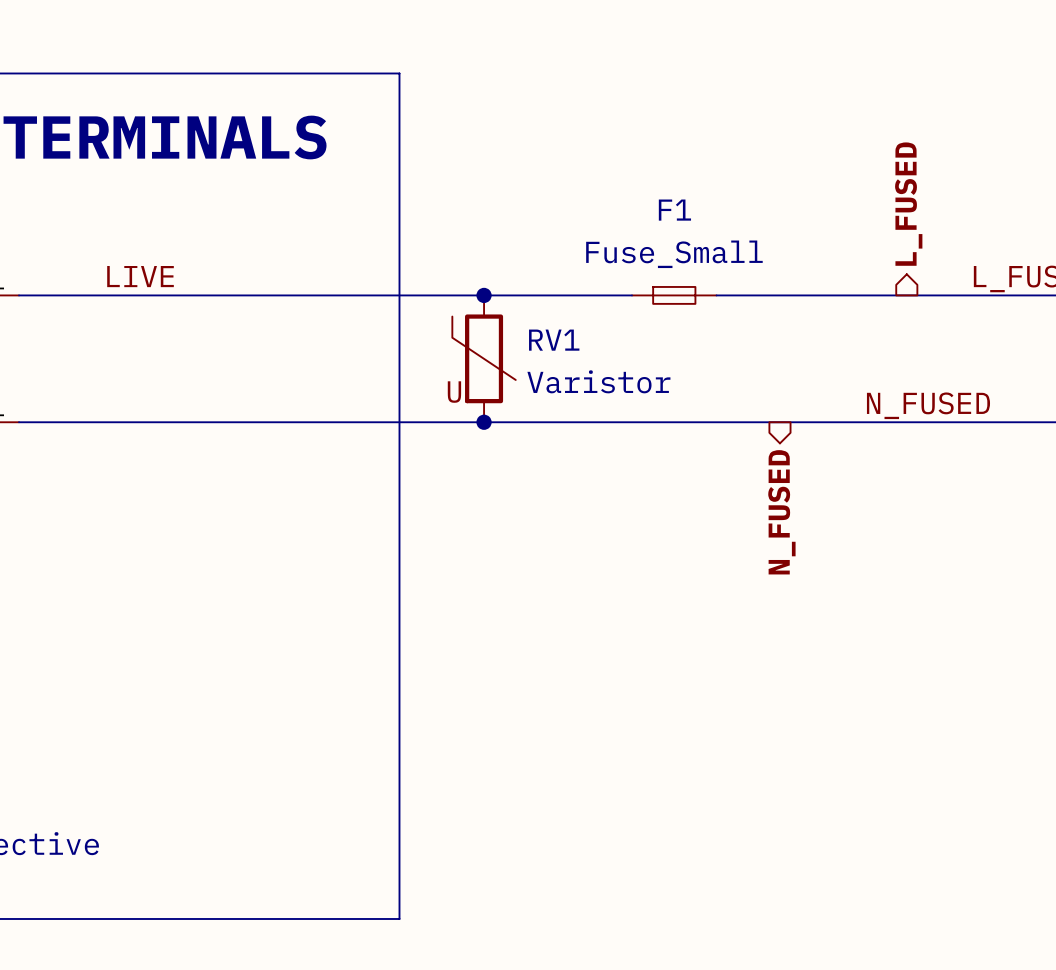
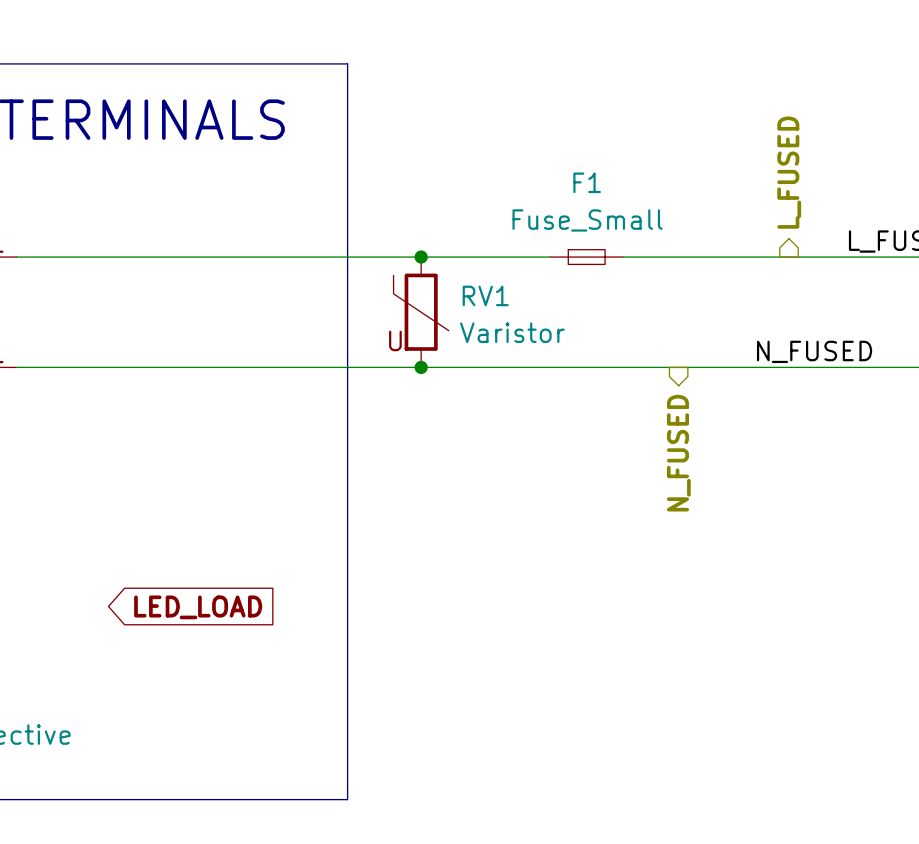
label: LIVE (140, 276) -> none
global label: none -> LED_LOAD (198, 607)

